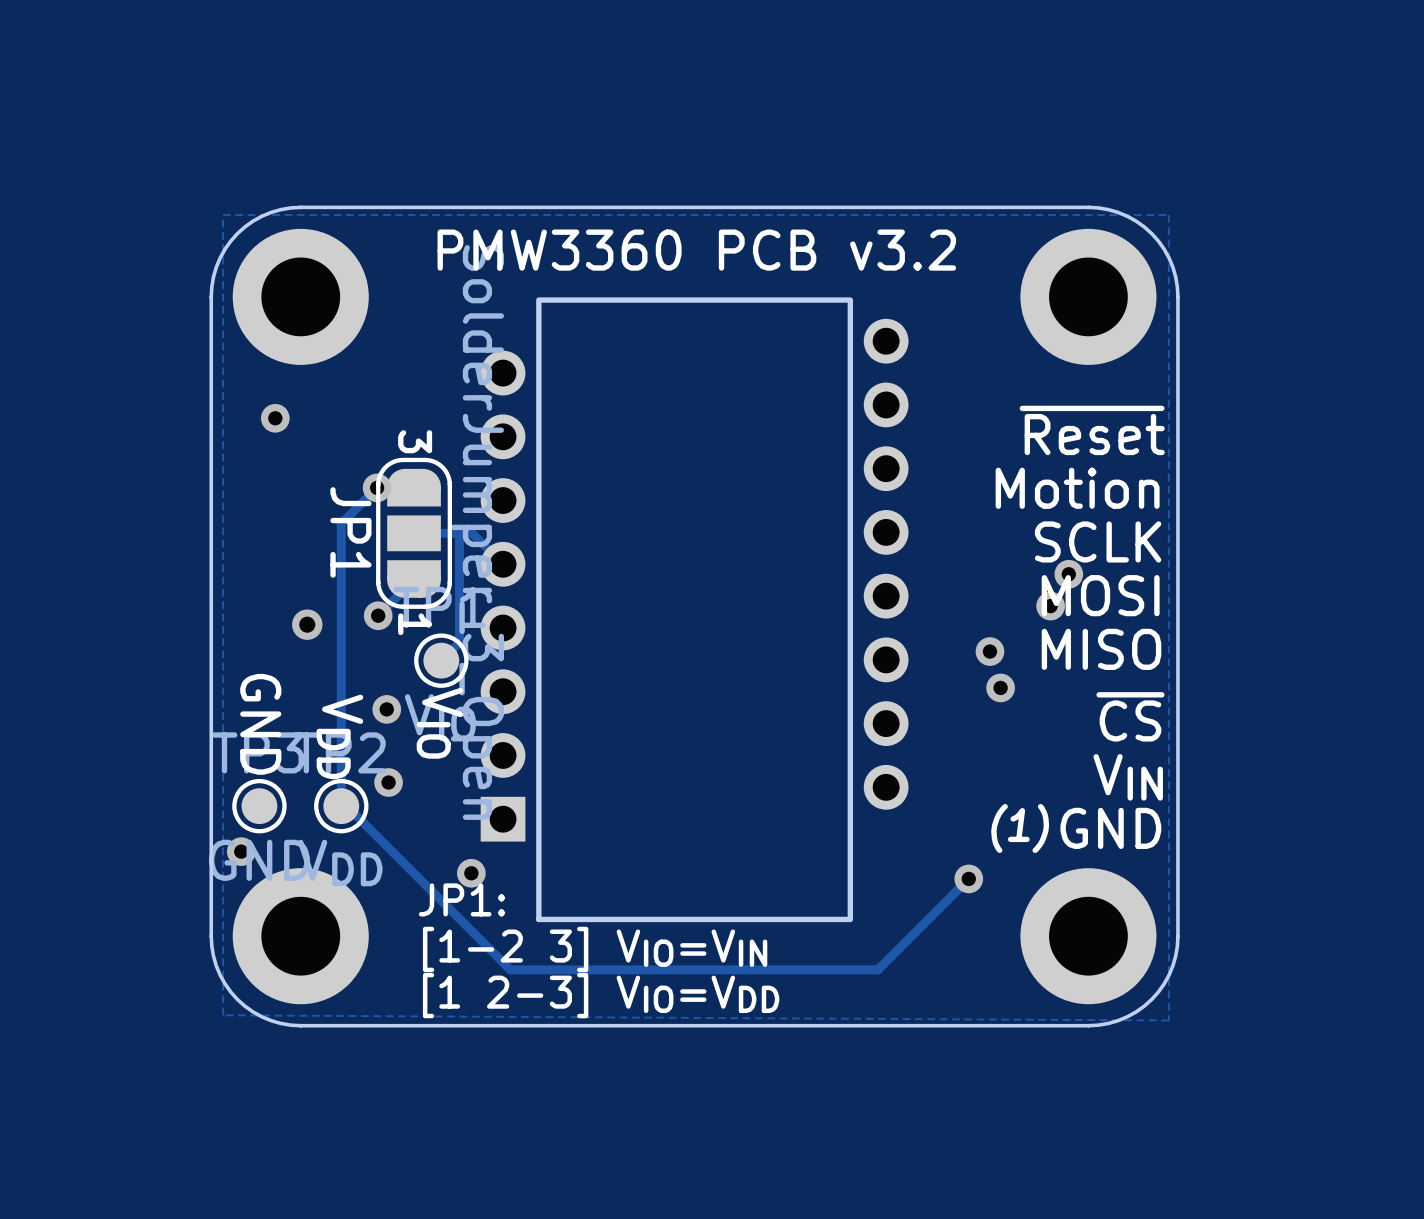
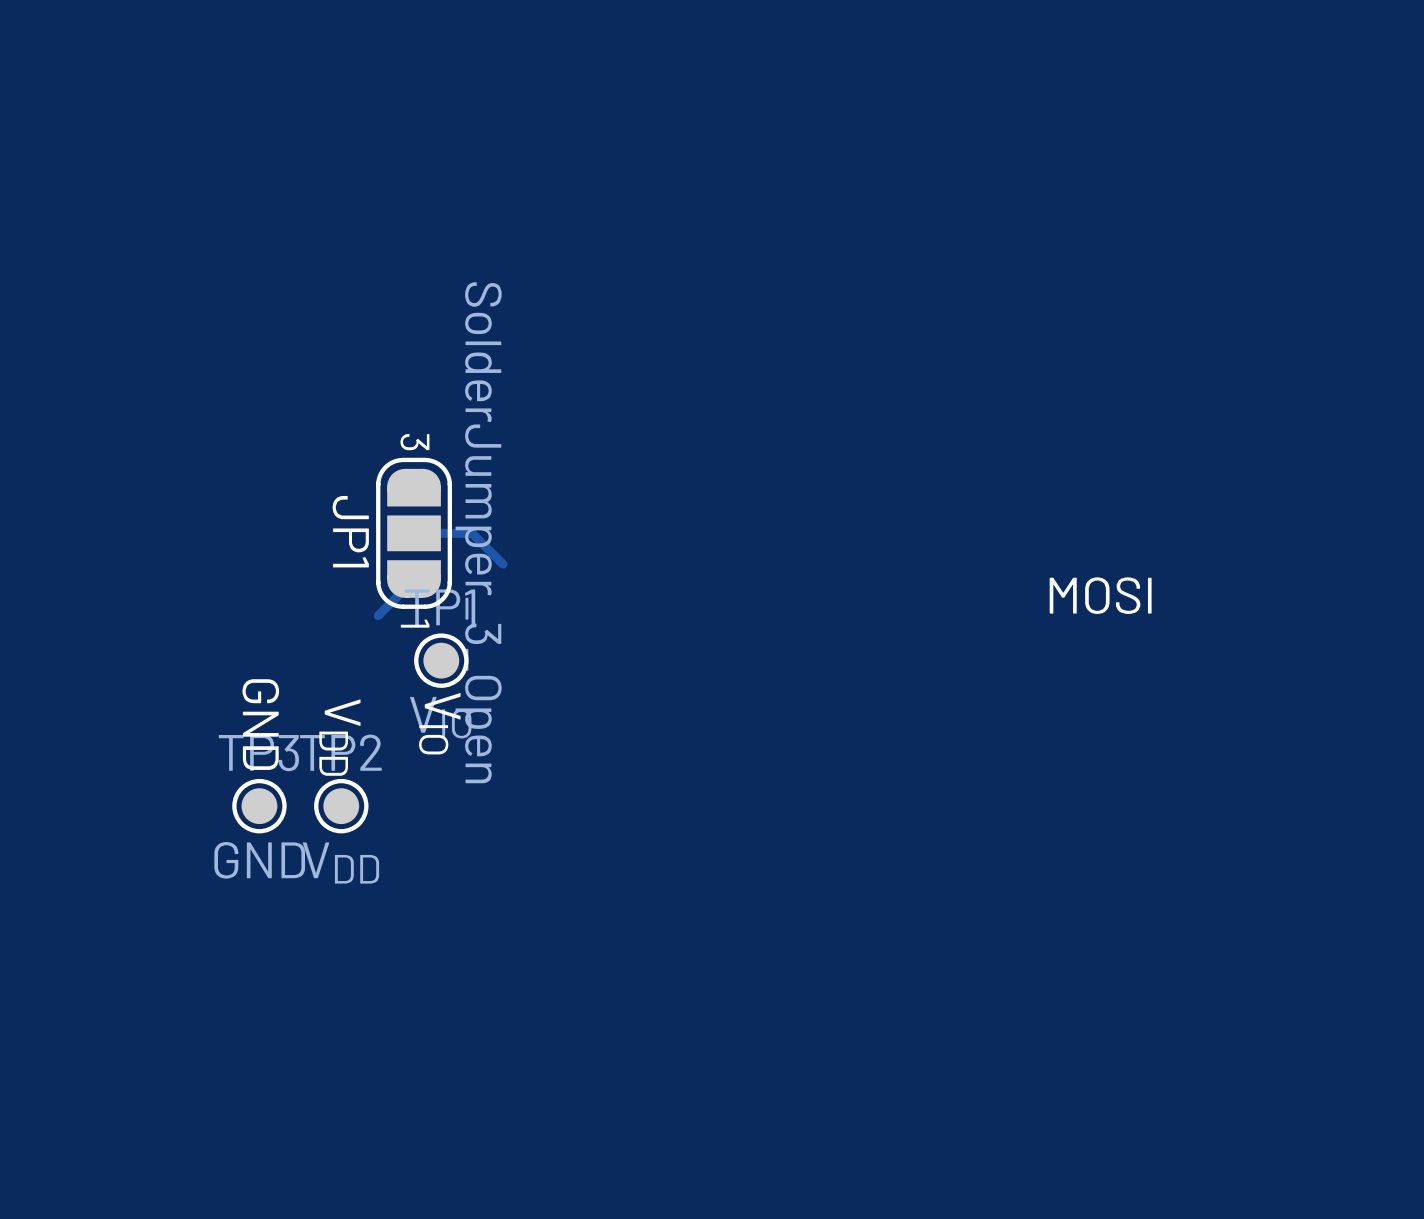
board edge: (1088, 207) (300, 207) (280, 209) (261, 216) (237, 233) (224, 249) (216, 267) (211, 296) (211, 936) (213, 956) (220, 975) (237, 999) (261, 1016) (280, 1023) (300, 1025) (1088, 1025) (1108, 1023) (1127, 1016) (1151, 999) (1164, 983) (1172, 965) (1177, 936) (1177, 286) (1172, 267) (1164, 249) (1144, 226) (1118, 212) (1088, 207) -> none
zone outline: (1168, 215) (223, 215) (223, 1015) (1168, 1020) (1168, 215) -> none
text: PMW3360 PCB v3.2 (696, 250) -> none
part: (300, 296) -> none
part: (1088, 296) -> none
via: (275, 418) -> none
text: ~{Reset} (1092, 430) -> none
track: (414, 486) (378, 486) (341, 523) (341, 806) (346, 806) (510, 969) (877, 969) (968, 878) -> none
via: (377, 487) -> none
text: Motion (1077, 488) -> none
track: (459, 533) (459, 642) (441, 660) -> none
text: SCLK (1098, 541) -> none
via: (1068, 574) -> none
via: (1050, 606) -> none
part: (694, 609) -> none
via: (378, 615) -> none
via: (307, 624) -> none
text: MISO (1101, 649) -> none
via: (989, 651) -> none
via: (1000, 687) -> none
via: (386, 709) -> none
text: ~{CS} (1130, 716) -> none
text: VIN (1128, 777) -> none
via: (388, 782) -> none
text: (1) (1020, 828) -> none
text: GND (1110, 828) -> none
via: (241, 851) -> none
via: (471, 873) -> none
via: (968, 878) -> none
text: JP1: (461, 899) -> none
part: (300, 936) -> none
part: (1088, 936) -> none
text: [1-2 3] VIO=VIN (595, 949) -> none
text: [1 2-3] VIO=VDD (601, 995) -> none

